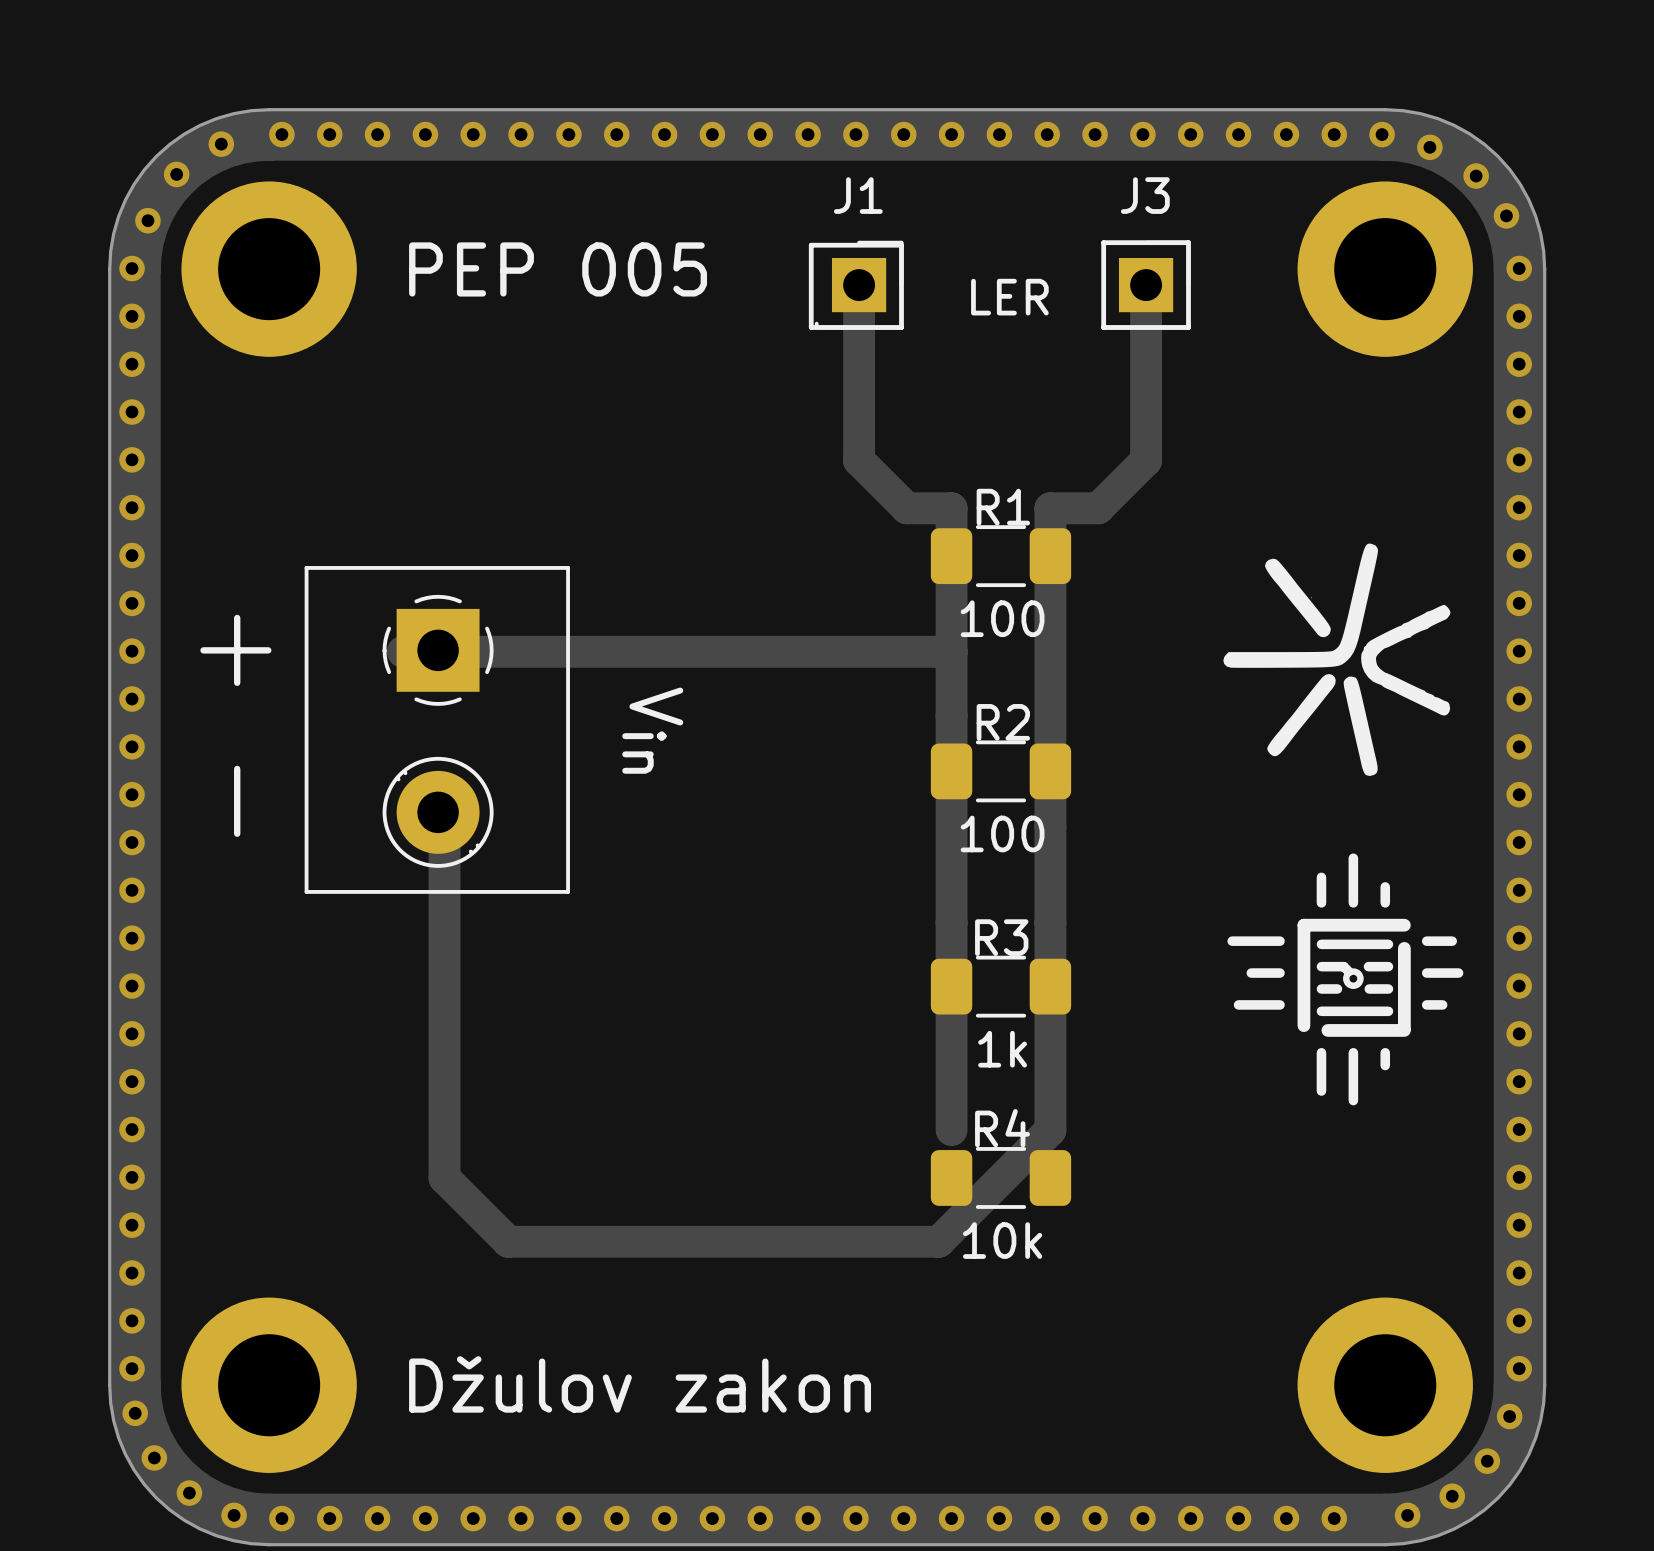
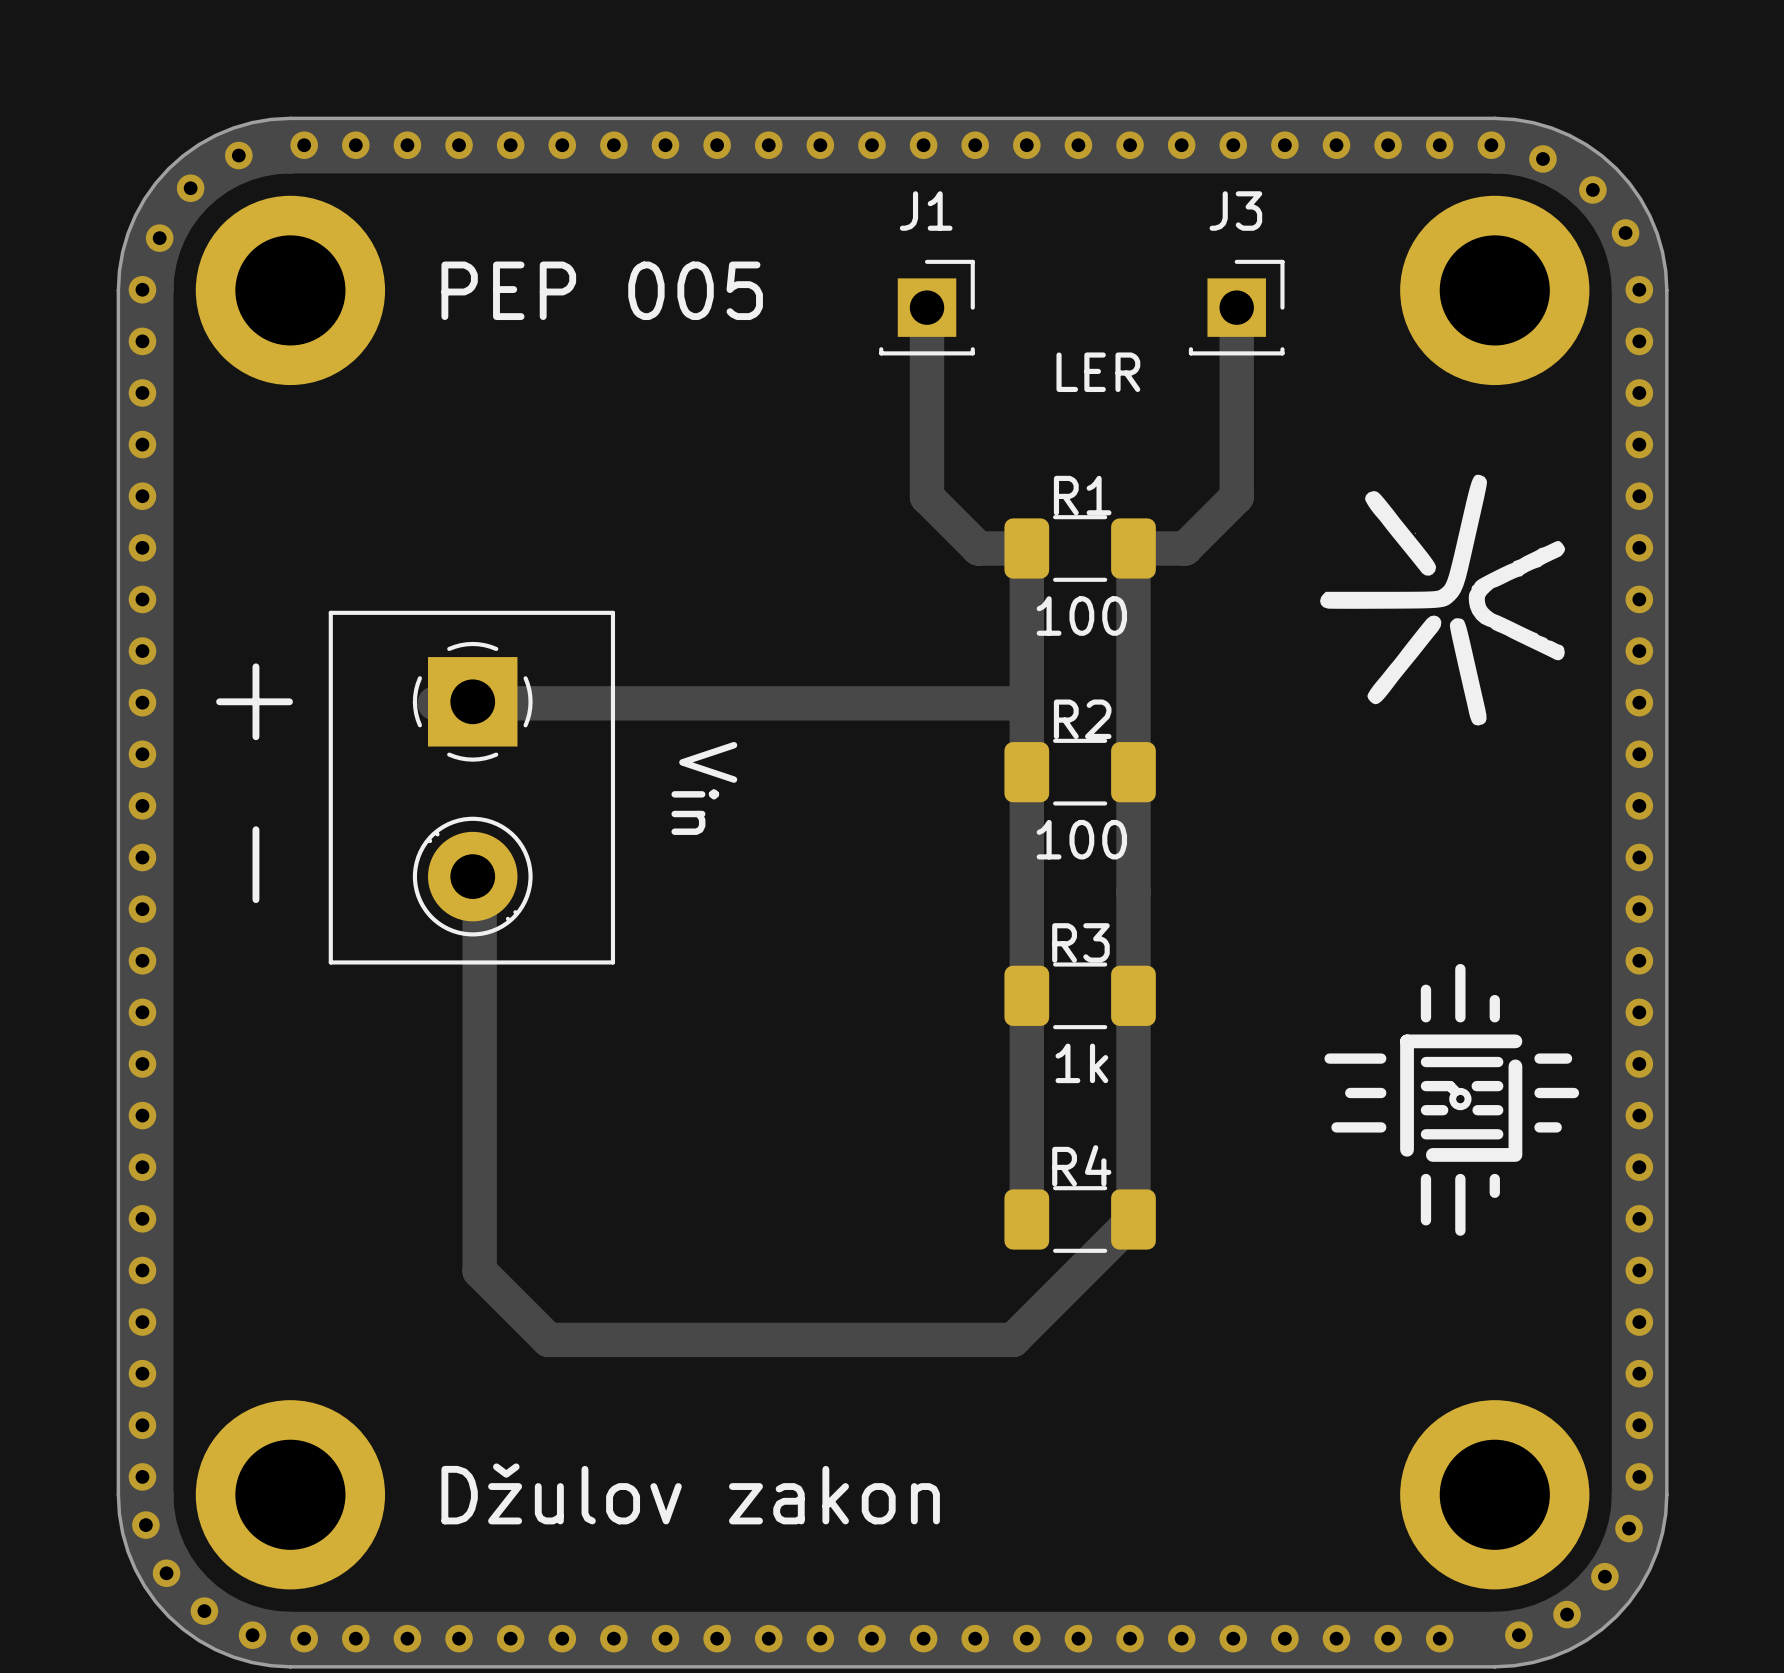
line: (1103, 242) (1188, 242) (1188, 327) (1103, 327) (1103, 242) -> none
line: (811, 245) (901, 245) (901, 327) (811, 327) (811, 245) -> none
text position: LER (1009, 297) -> LER (1098, 372)
R1 position: (1000, 556) -> (1080, 548)
drawing position: (1336, 659) -> (1442, 600)
R2 position: (1000, 771) -> (1080, 772)
drawing position: (1345, 979) -> (1451, 1099)
R3 position: (1000, 986) -> (1080, 995)
R4 position: (1000, 1177) -> (1080, 1219)
text: 10k (1002, 1240) -> none

